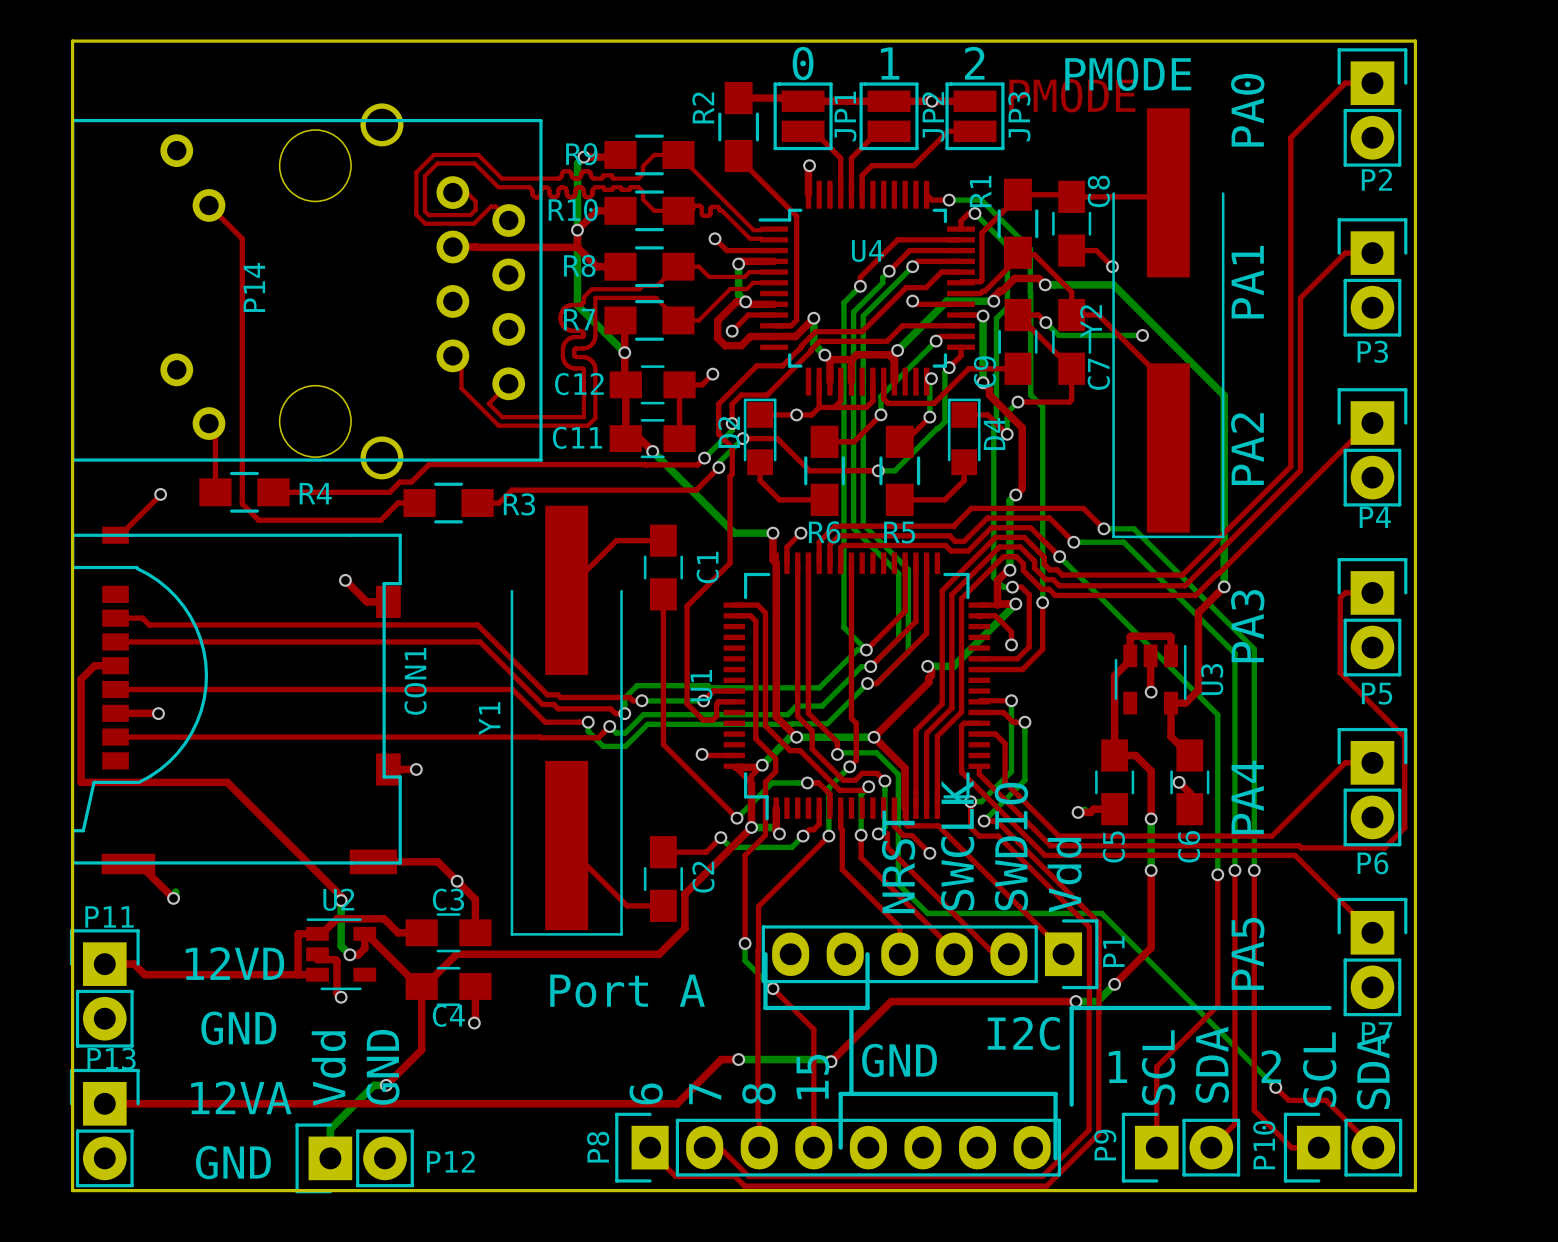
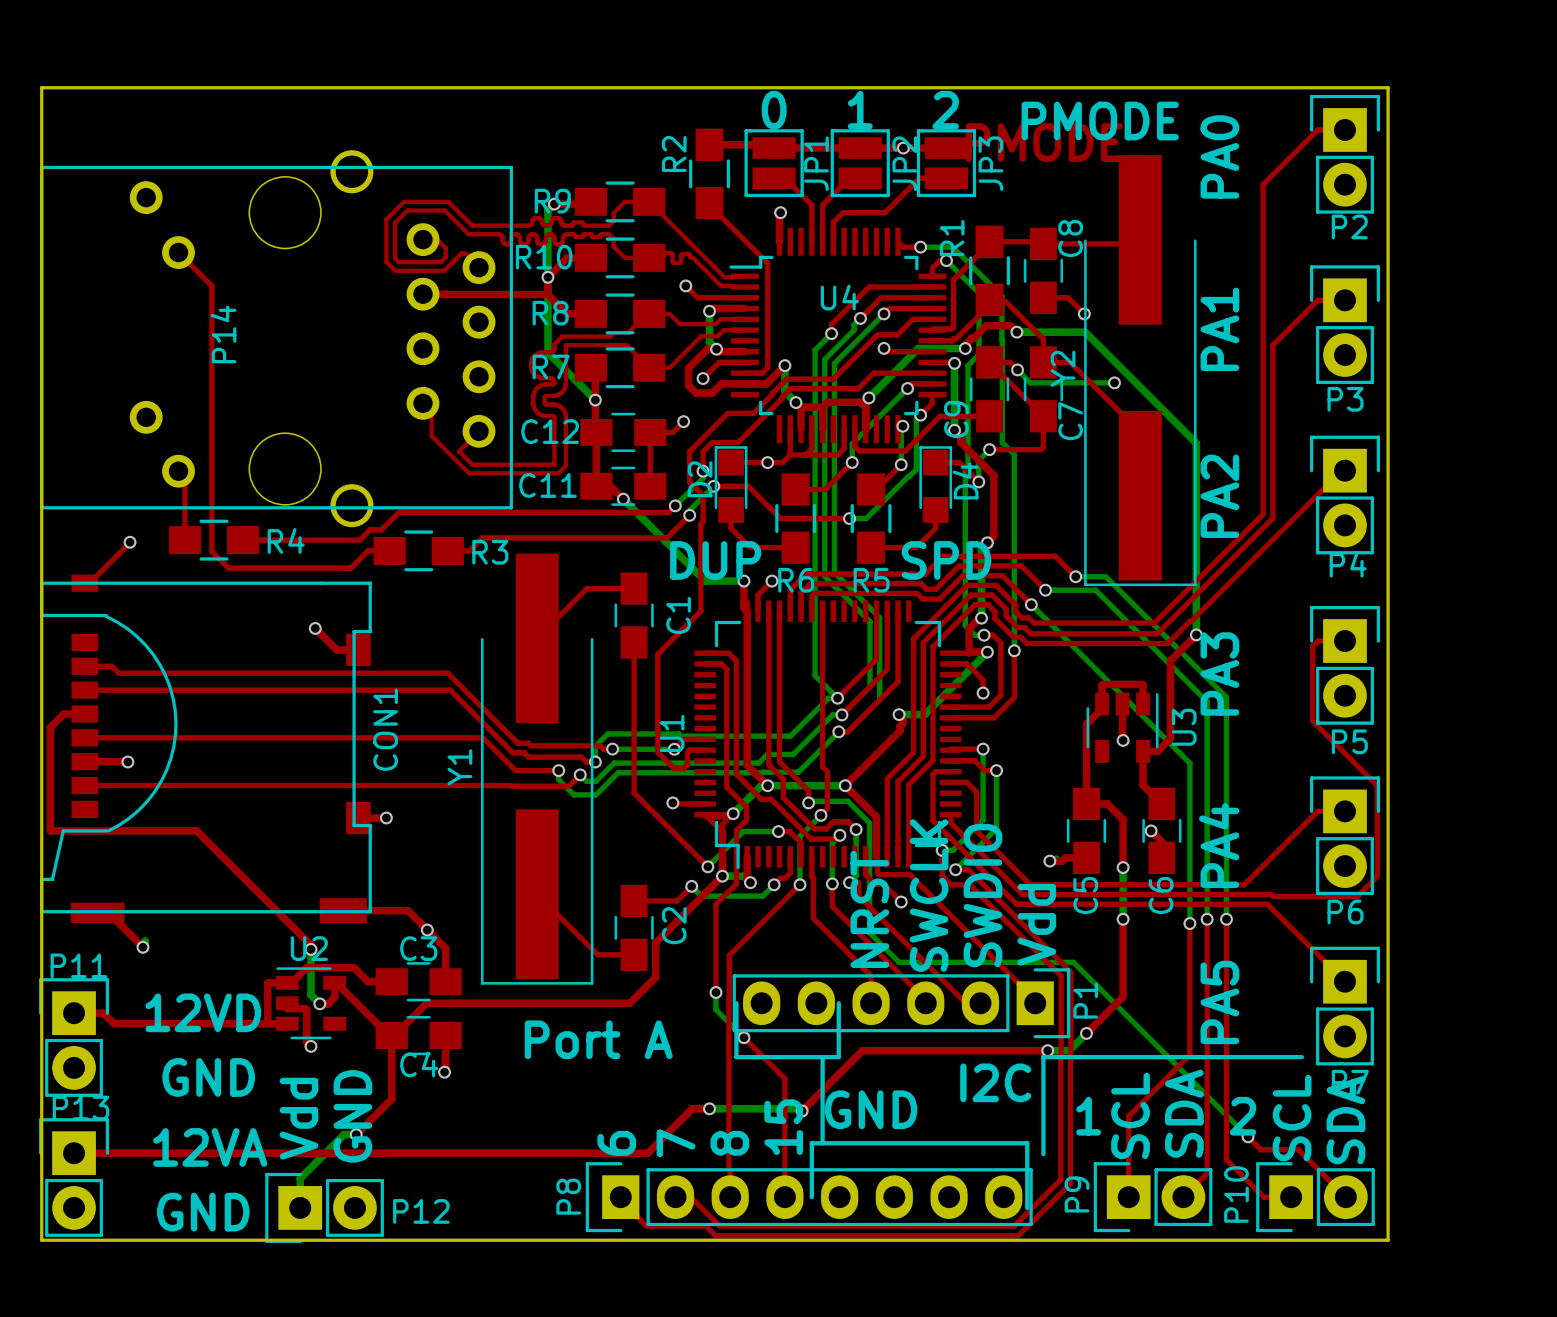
text: none -> DUP (715, 560)
text: none -> SPD (946, 560)

